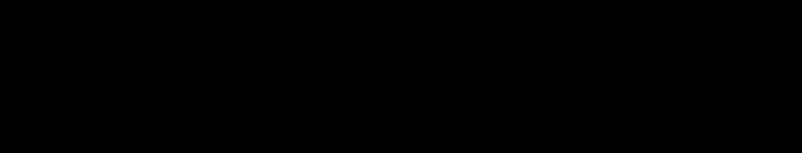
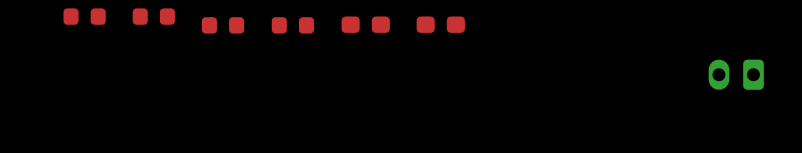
part: none -> (84, 16)
part: none -> (153, 16)
part: none -> (365, 24)
part: none -> (440, 24)
part: none -> (223, 25)
part: none -> (292, 25)
part: none -> (736, 74)

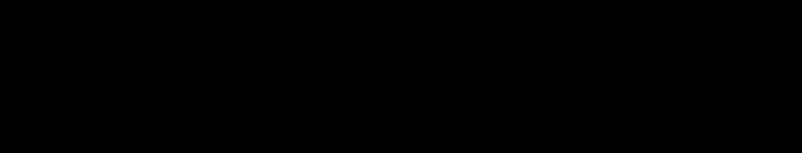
part: (84, 16) -> none
part: (153, 16) -> none
part: (365, 24) -> none
part: (440, 24) -> none
part: (223, 25) -> none
part: (292, 25) -> none
part: (736, 74) -> none

